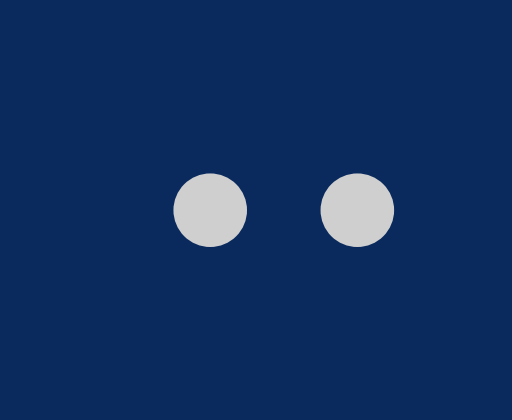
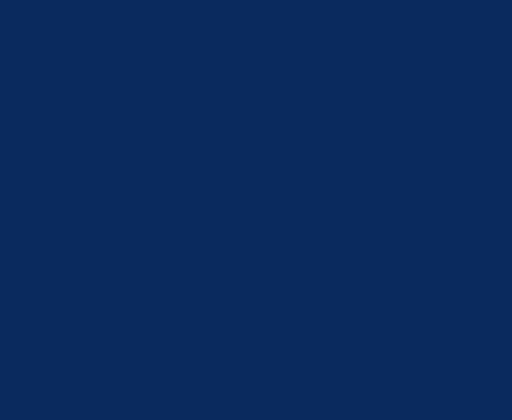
part: (283, 210) -> none

